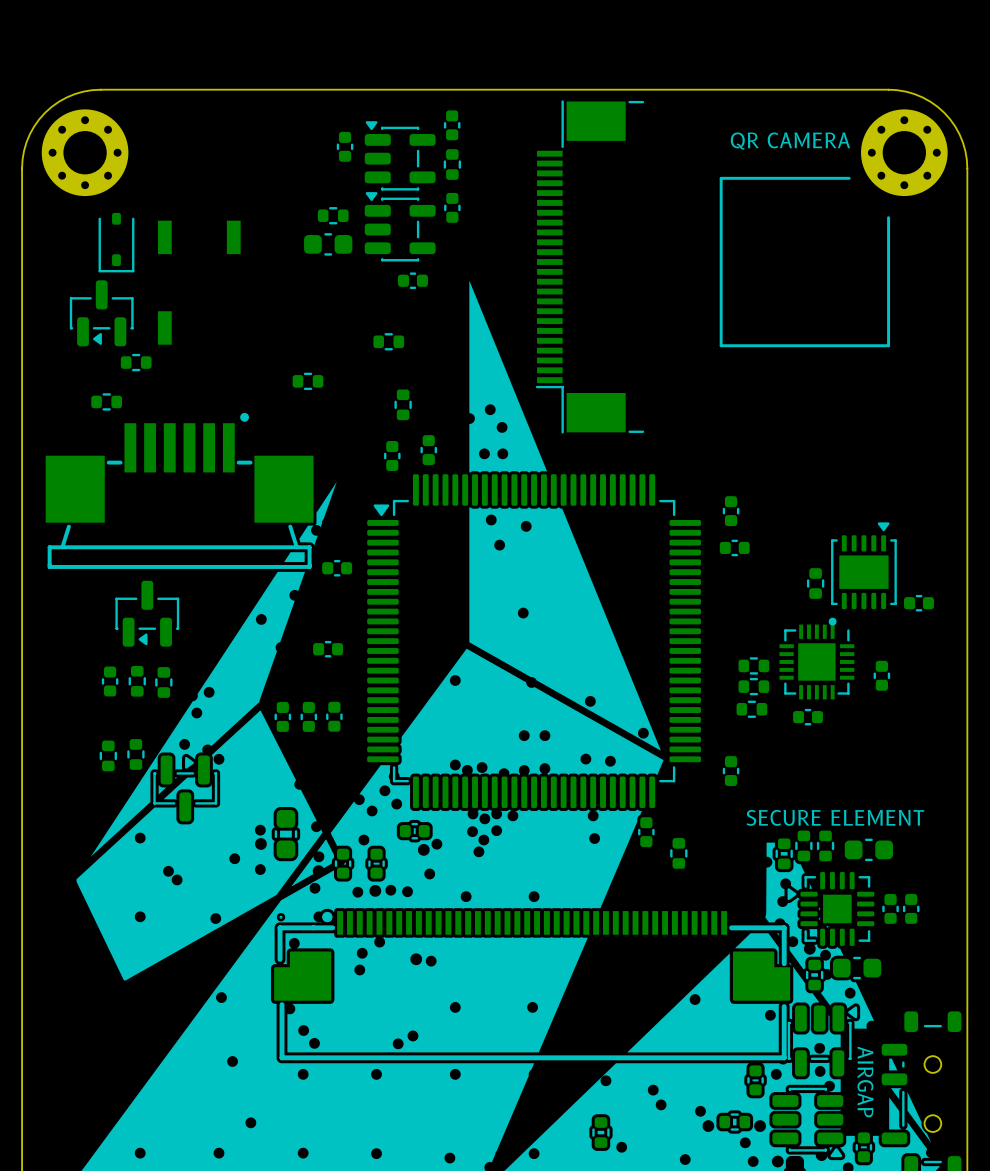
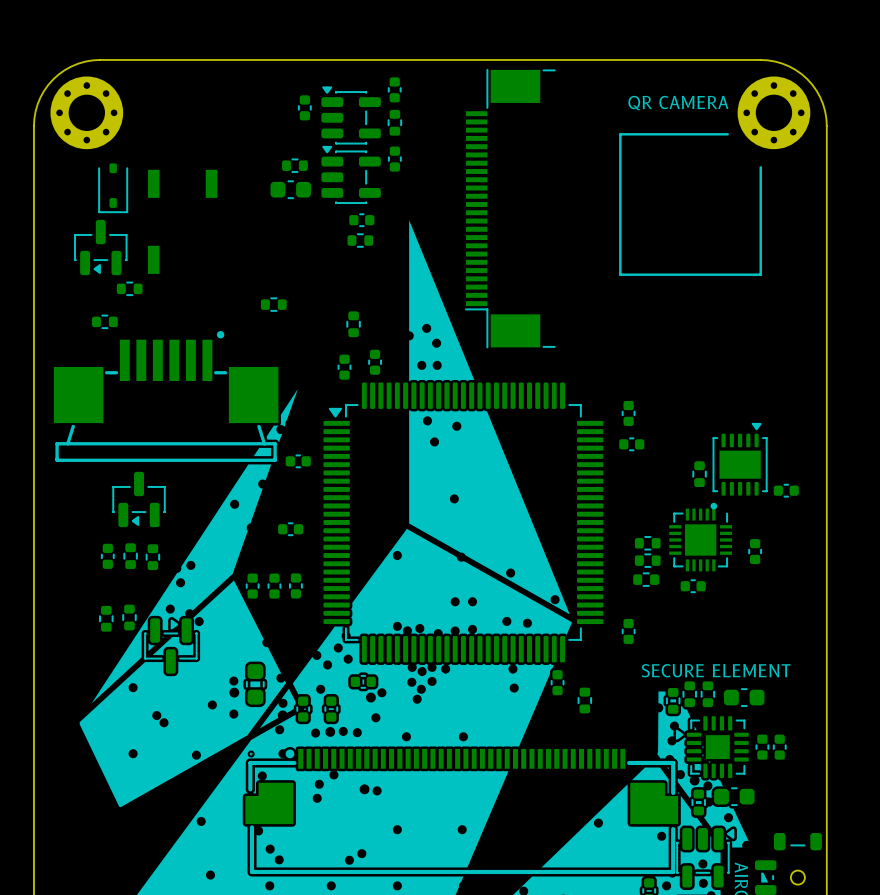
part position: (388, 341) -> (360, 240)

